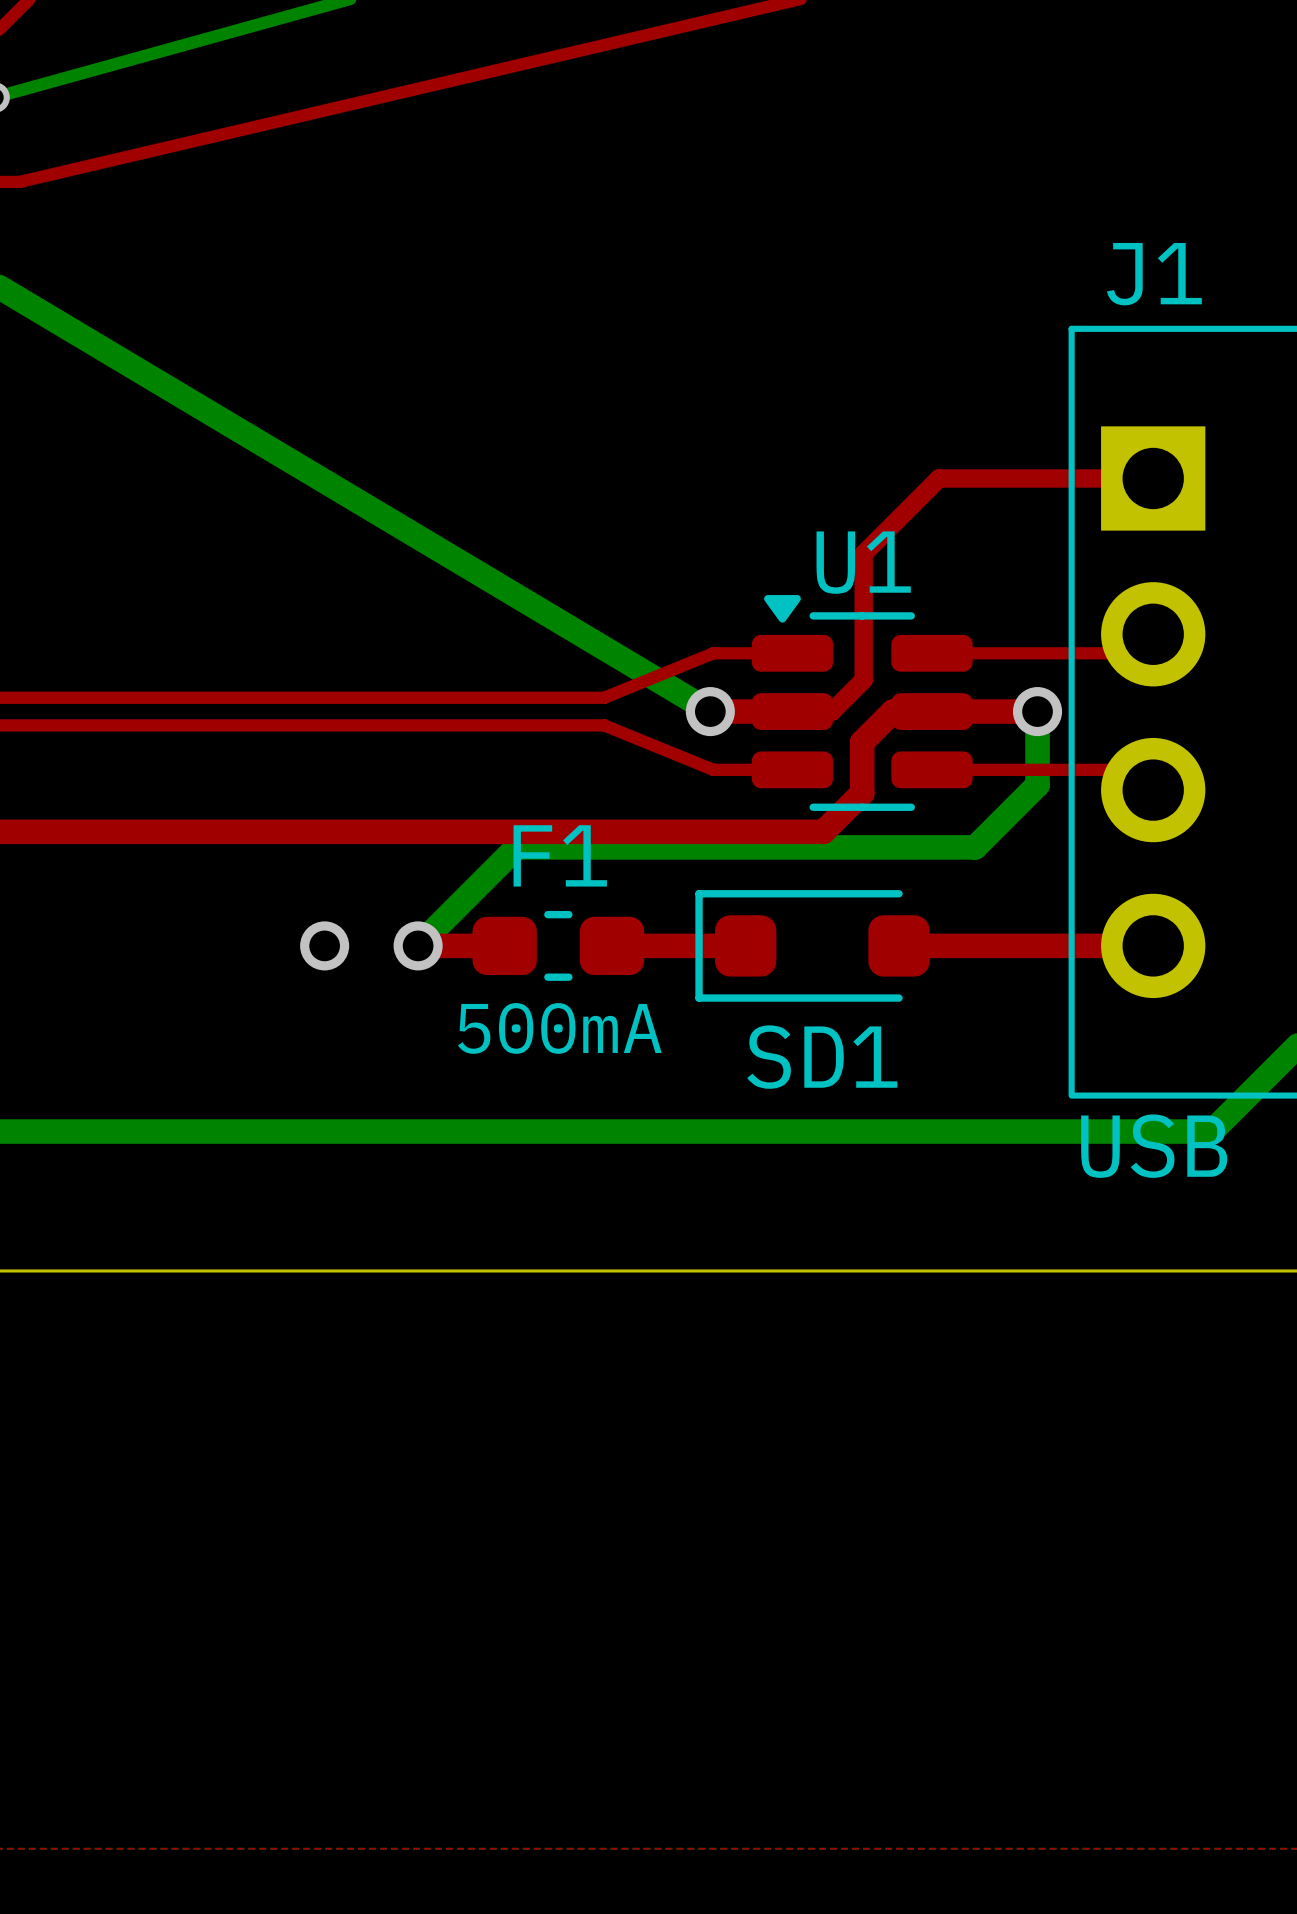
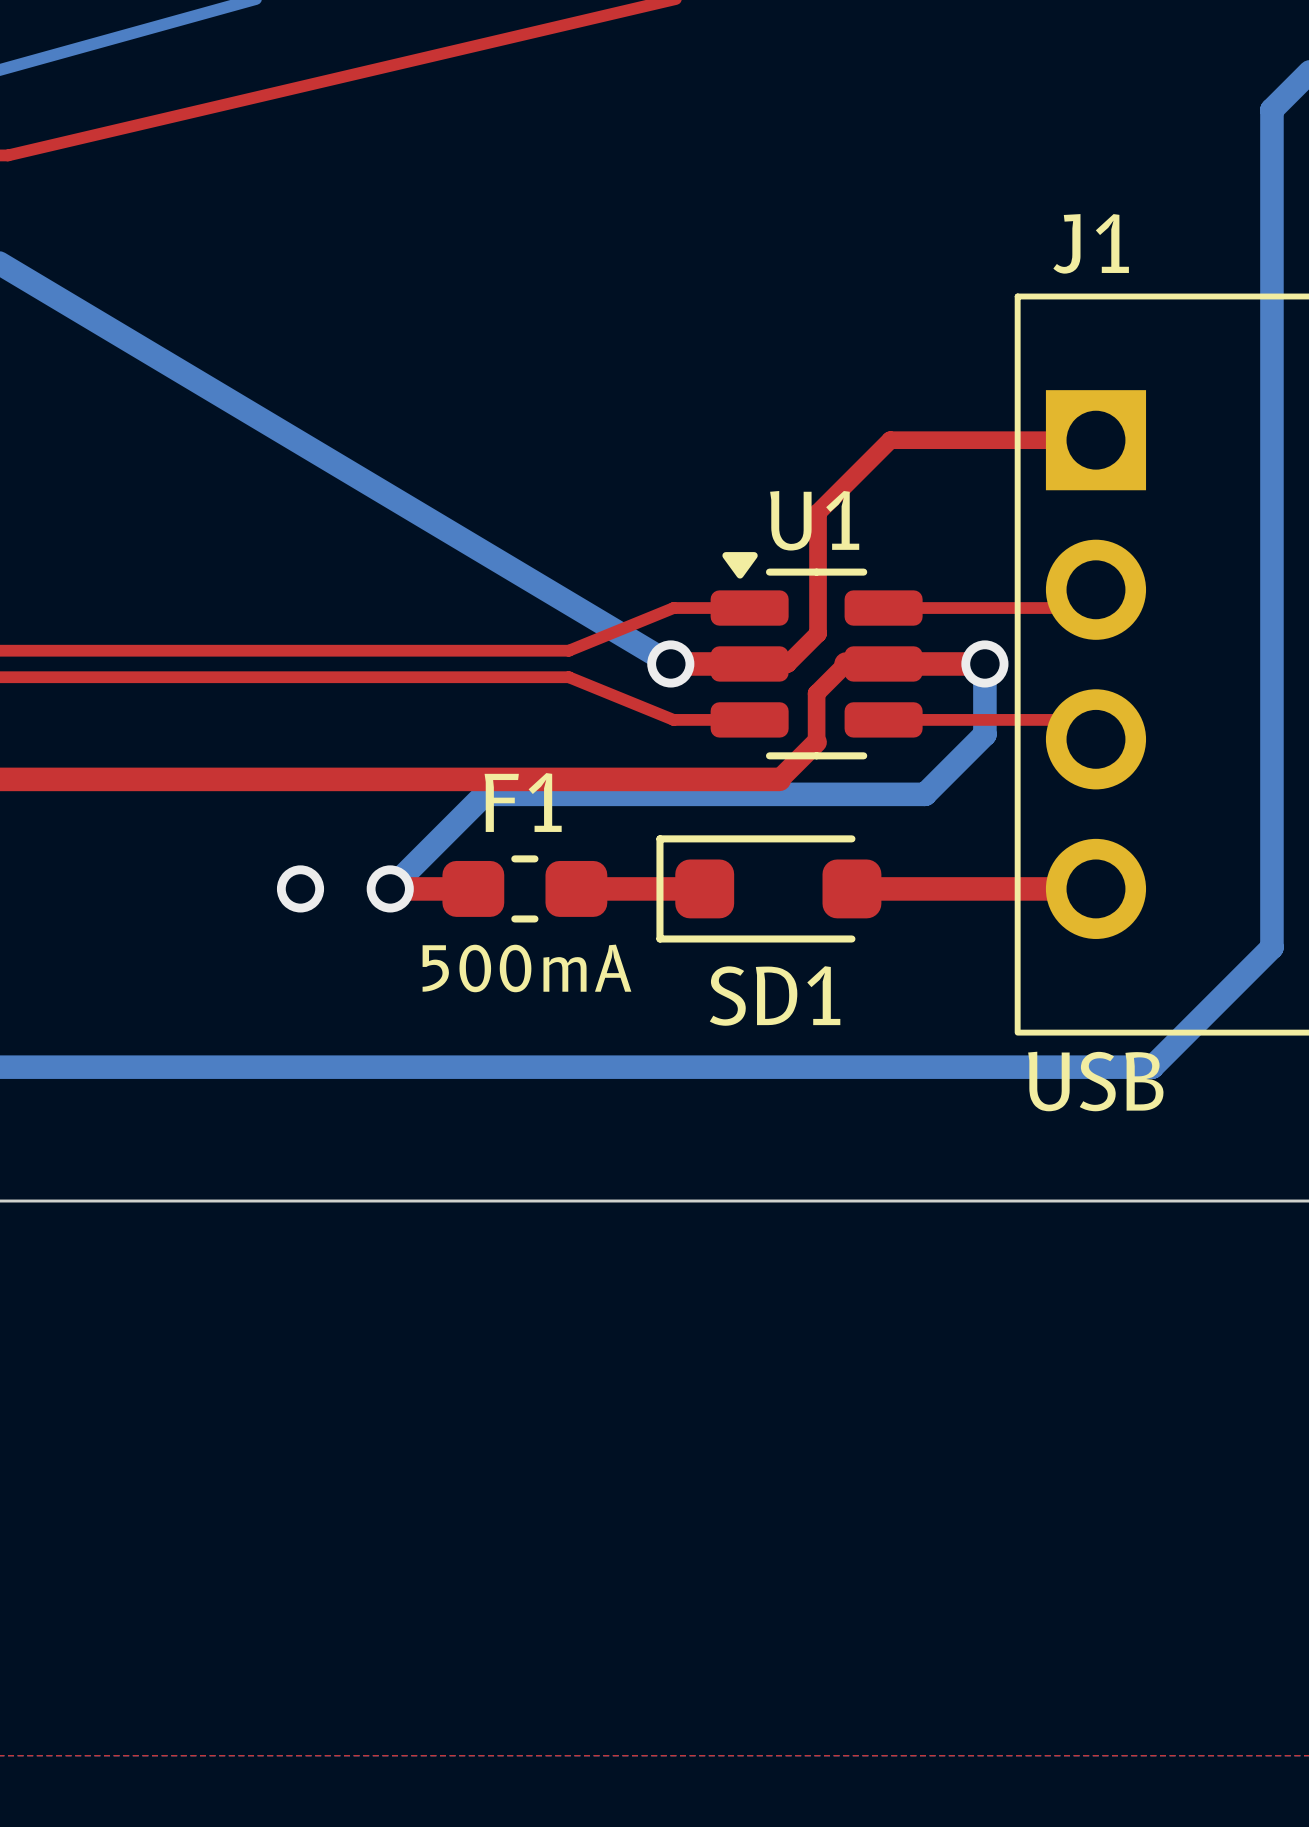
top track width: thick (892, 711) (862, 742) (862, 793) (823, 831) -> thin (846, 663) (816, 693) (816, 742) (779, 779)

